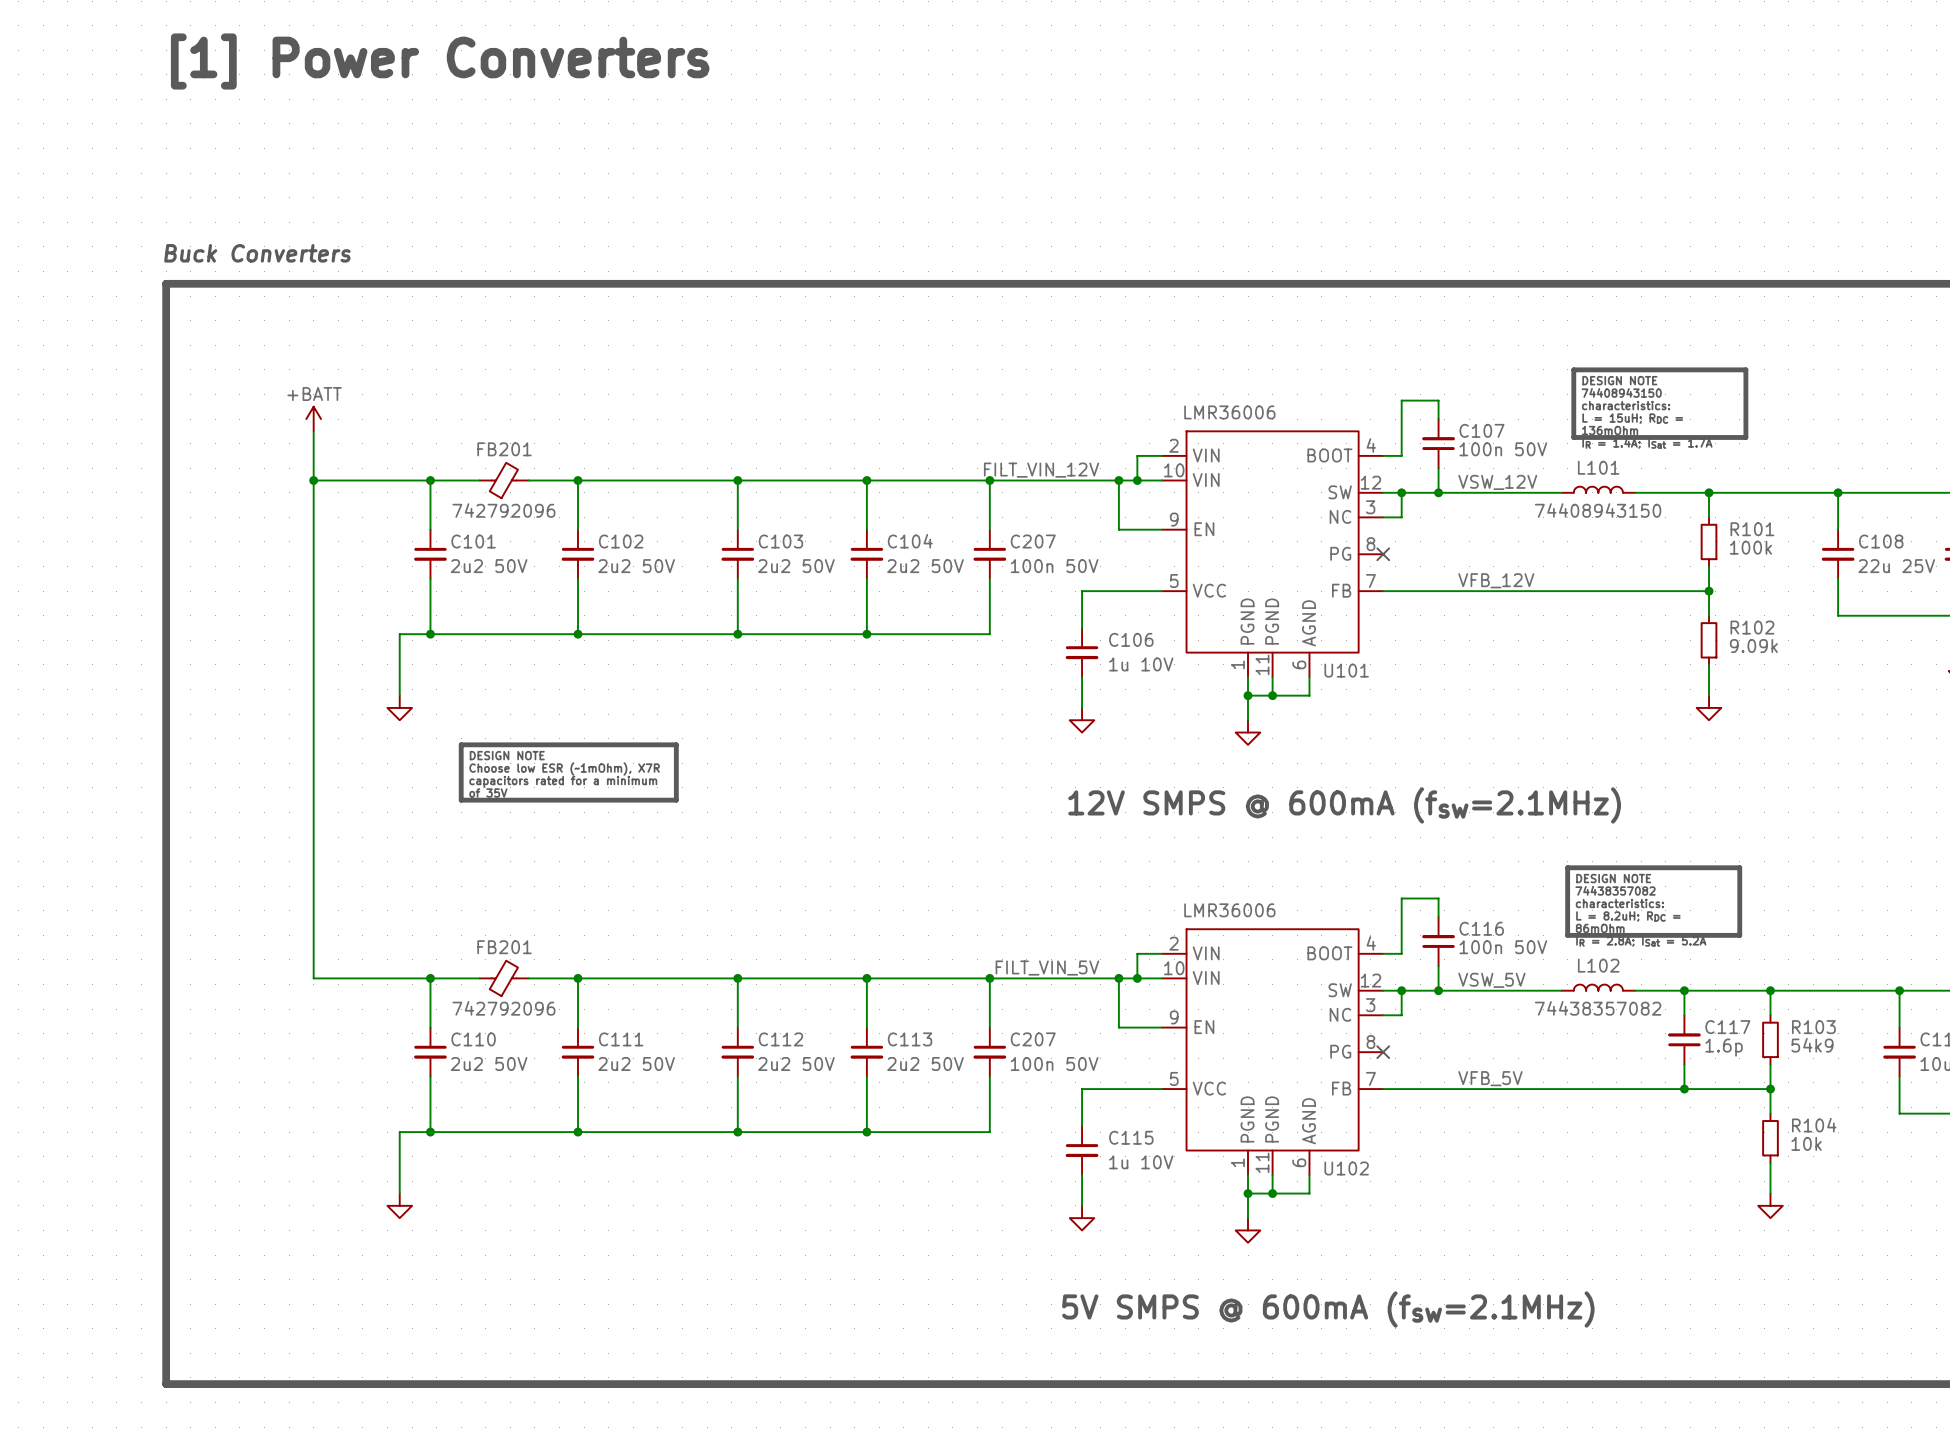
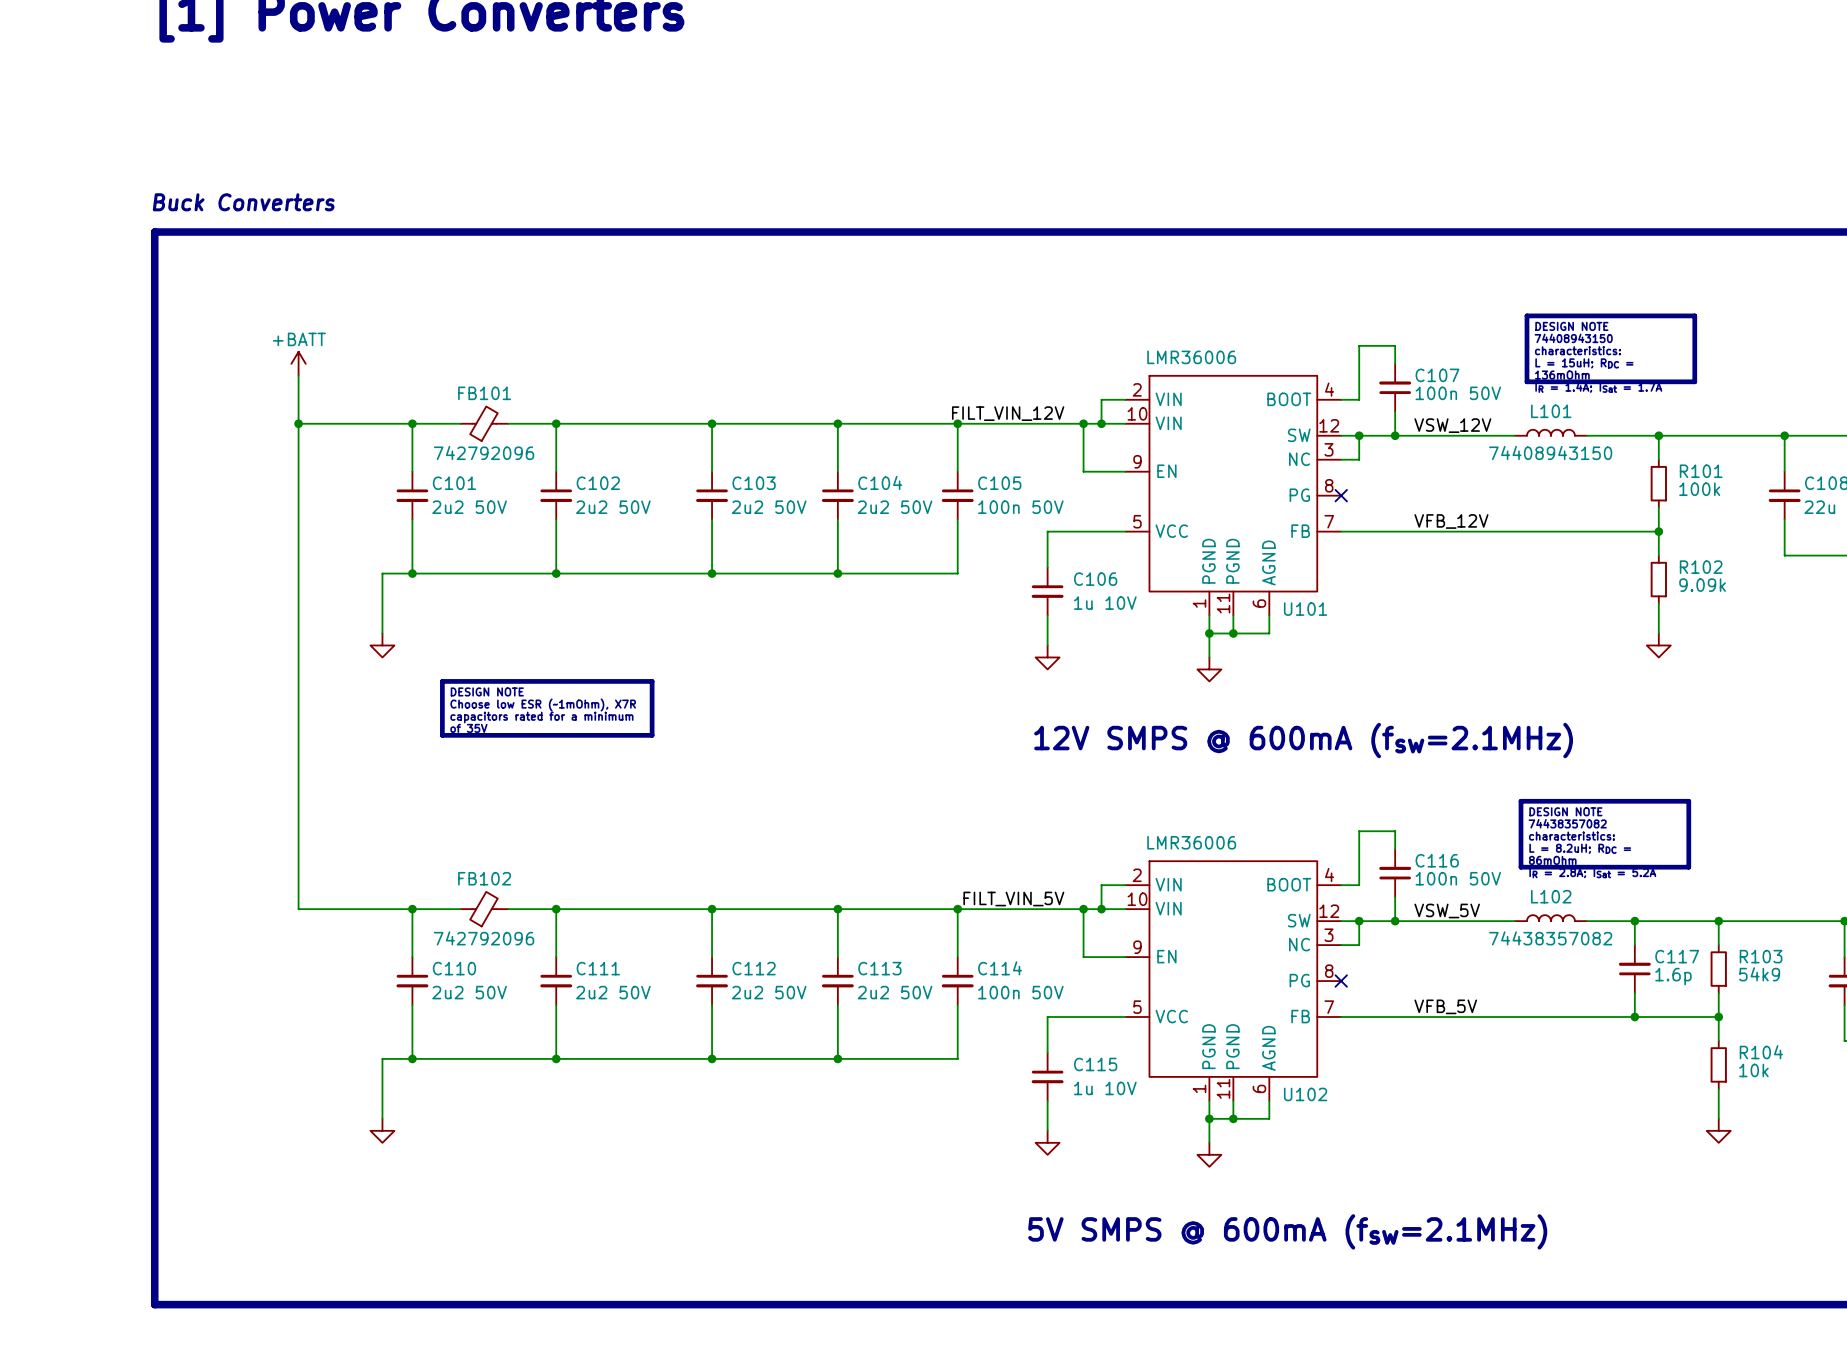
FB201 name: FB201 (504, 449) -> FB101 (484, 393)
C207 name: C207 (1033, 541) -> C105 (999, 483)
FB201 name: FB201 (504, 947) -> FB102 (484, 878)
C207 name: C207 (1033, 1039) -> C114 (1000, 968)

